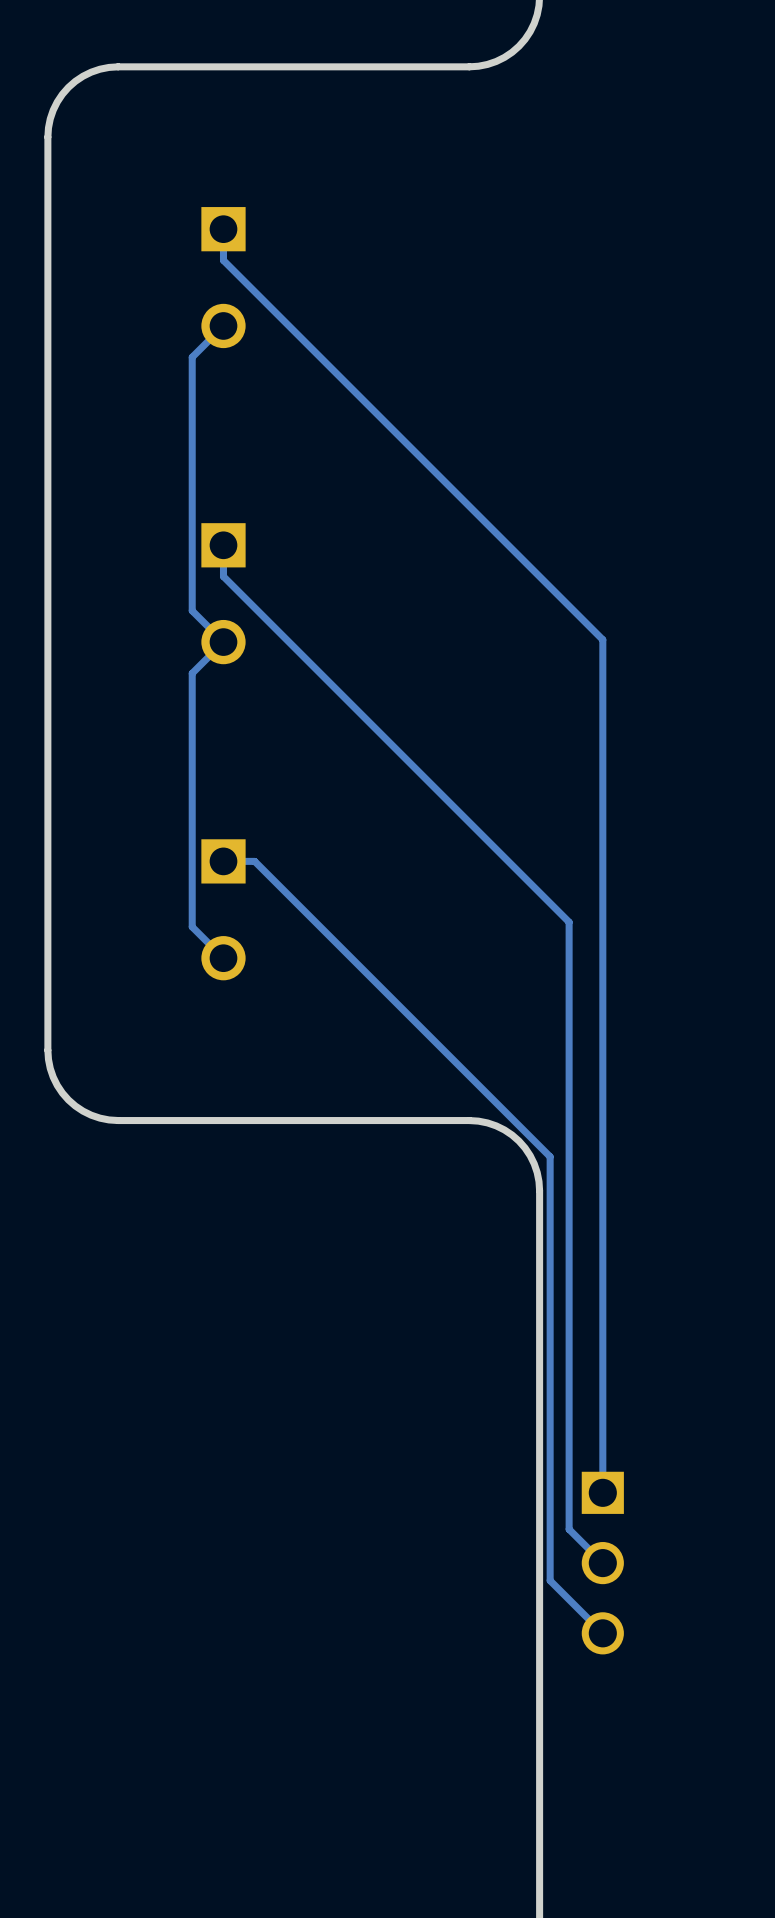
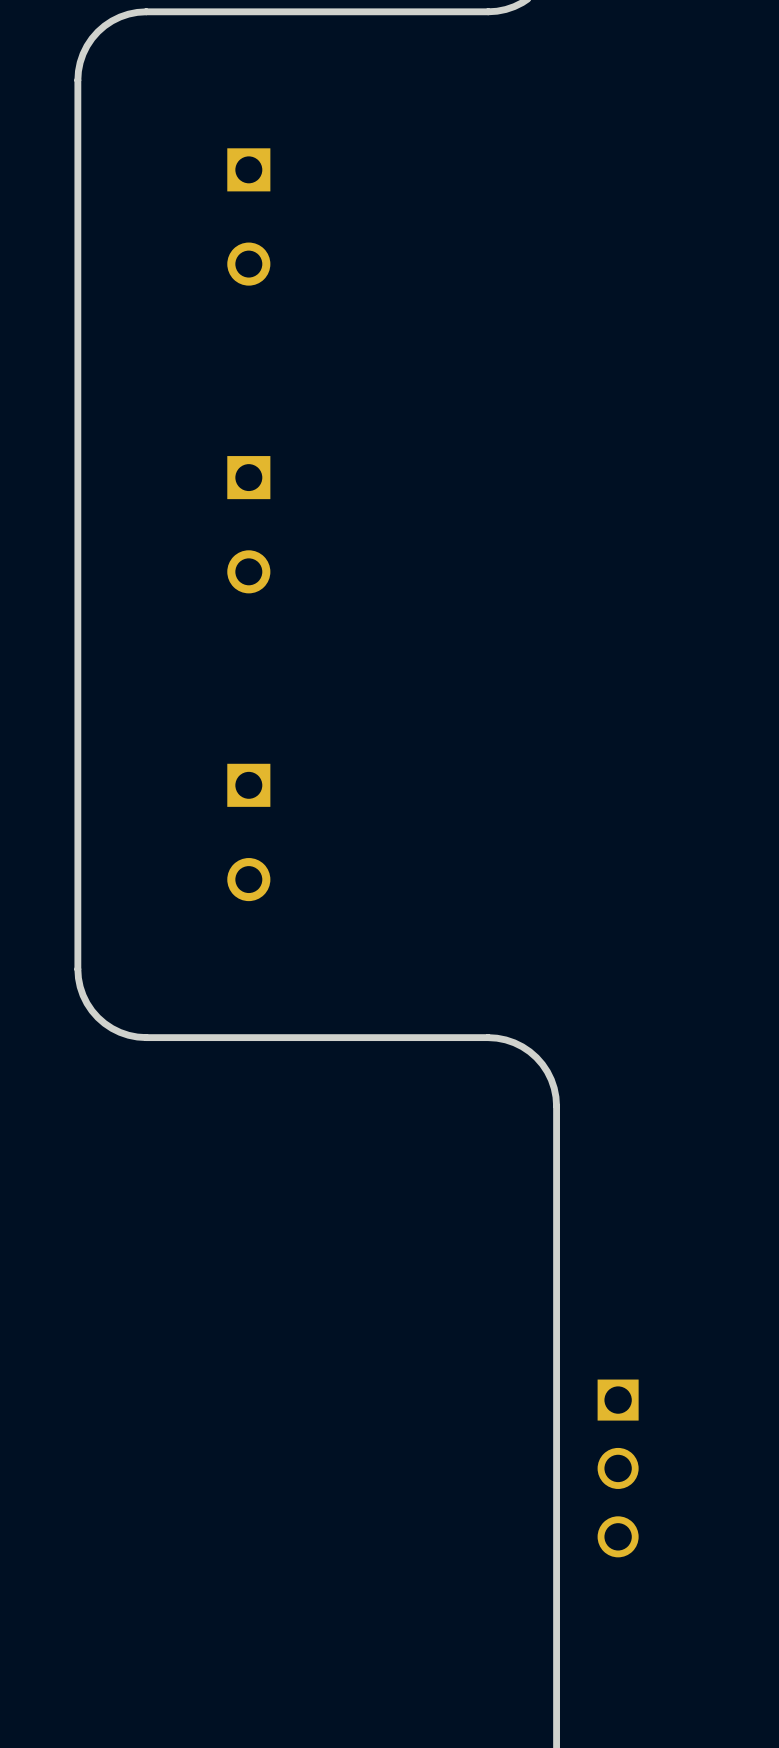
track: (223, 229) (223, 260) (602, 639) (602, 1492) -> none
track: (223, 325) (192, 357) (192, 610) (223, 642) (192, 673) (192, 926) (223, 958) -> none
track: (223, 545) (223, 576) (569, 922) (569, 1529) (602, 1563) -> none
track: (223, 861) (254, 861) (550, 1156) (550, 1580) (602, 1633) -> none

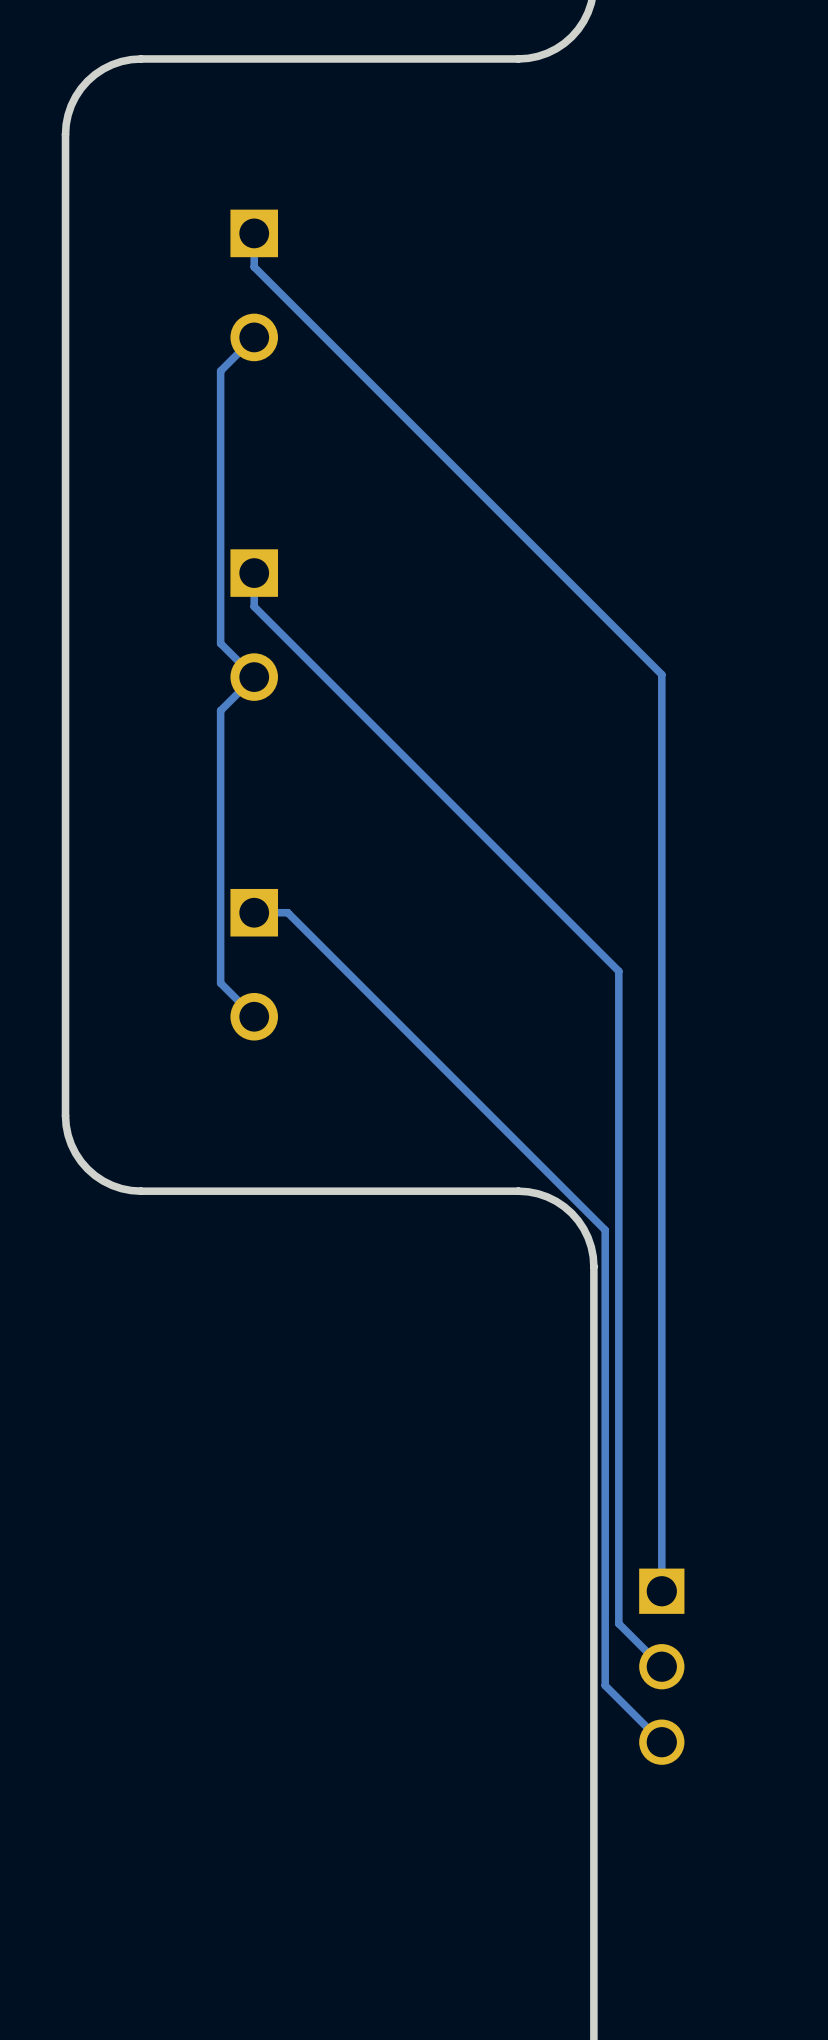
track: none -> (254, 233) (254, 267) (661, 674) (661, 1591)
track: none -> (254, 337) (220, 371) (220, 643) (254, 677) (220, 710) (220, 983) (254, 1016)
track: none -> (254, 573) (254, 606) (618, 971) (618, 1623) (661, 1666)
track: none -> (254, 912) (287, 912) (605, 1230) (605, 1685) (661, 1742)

